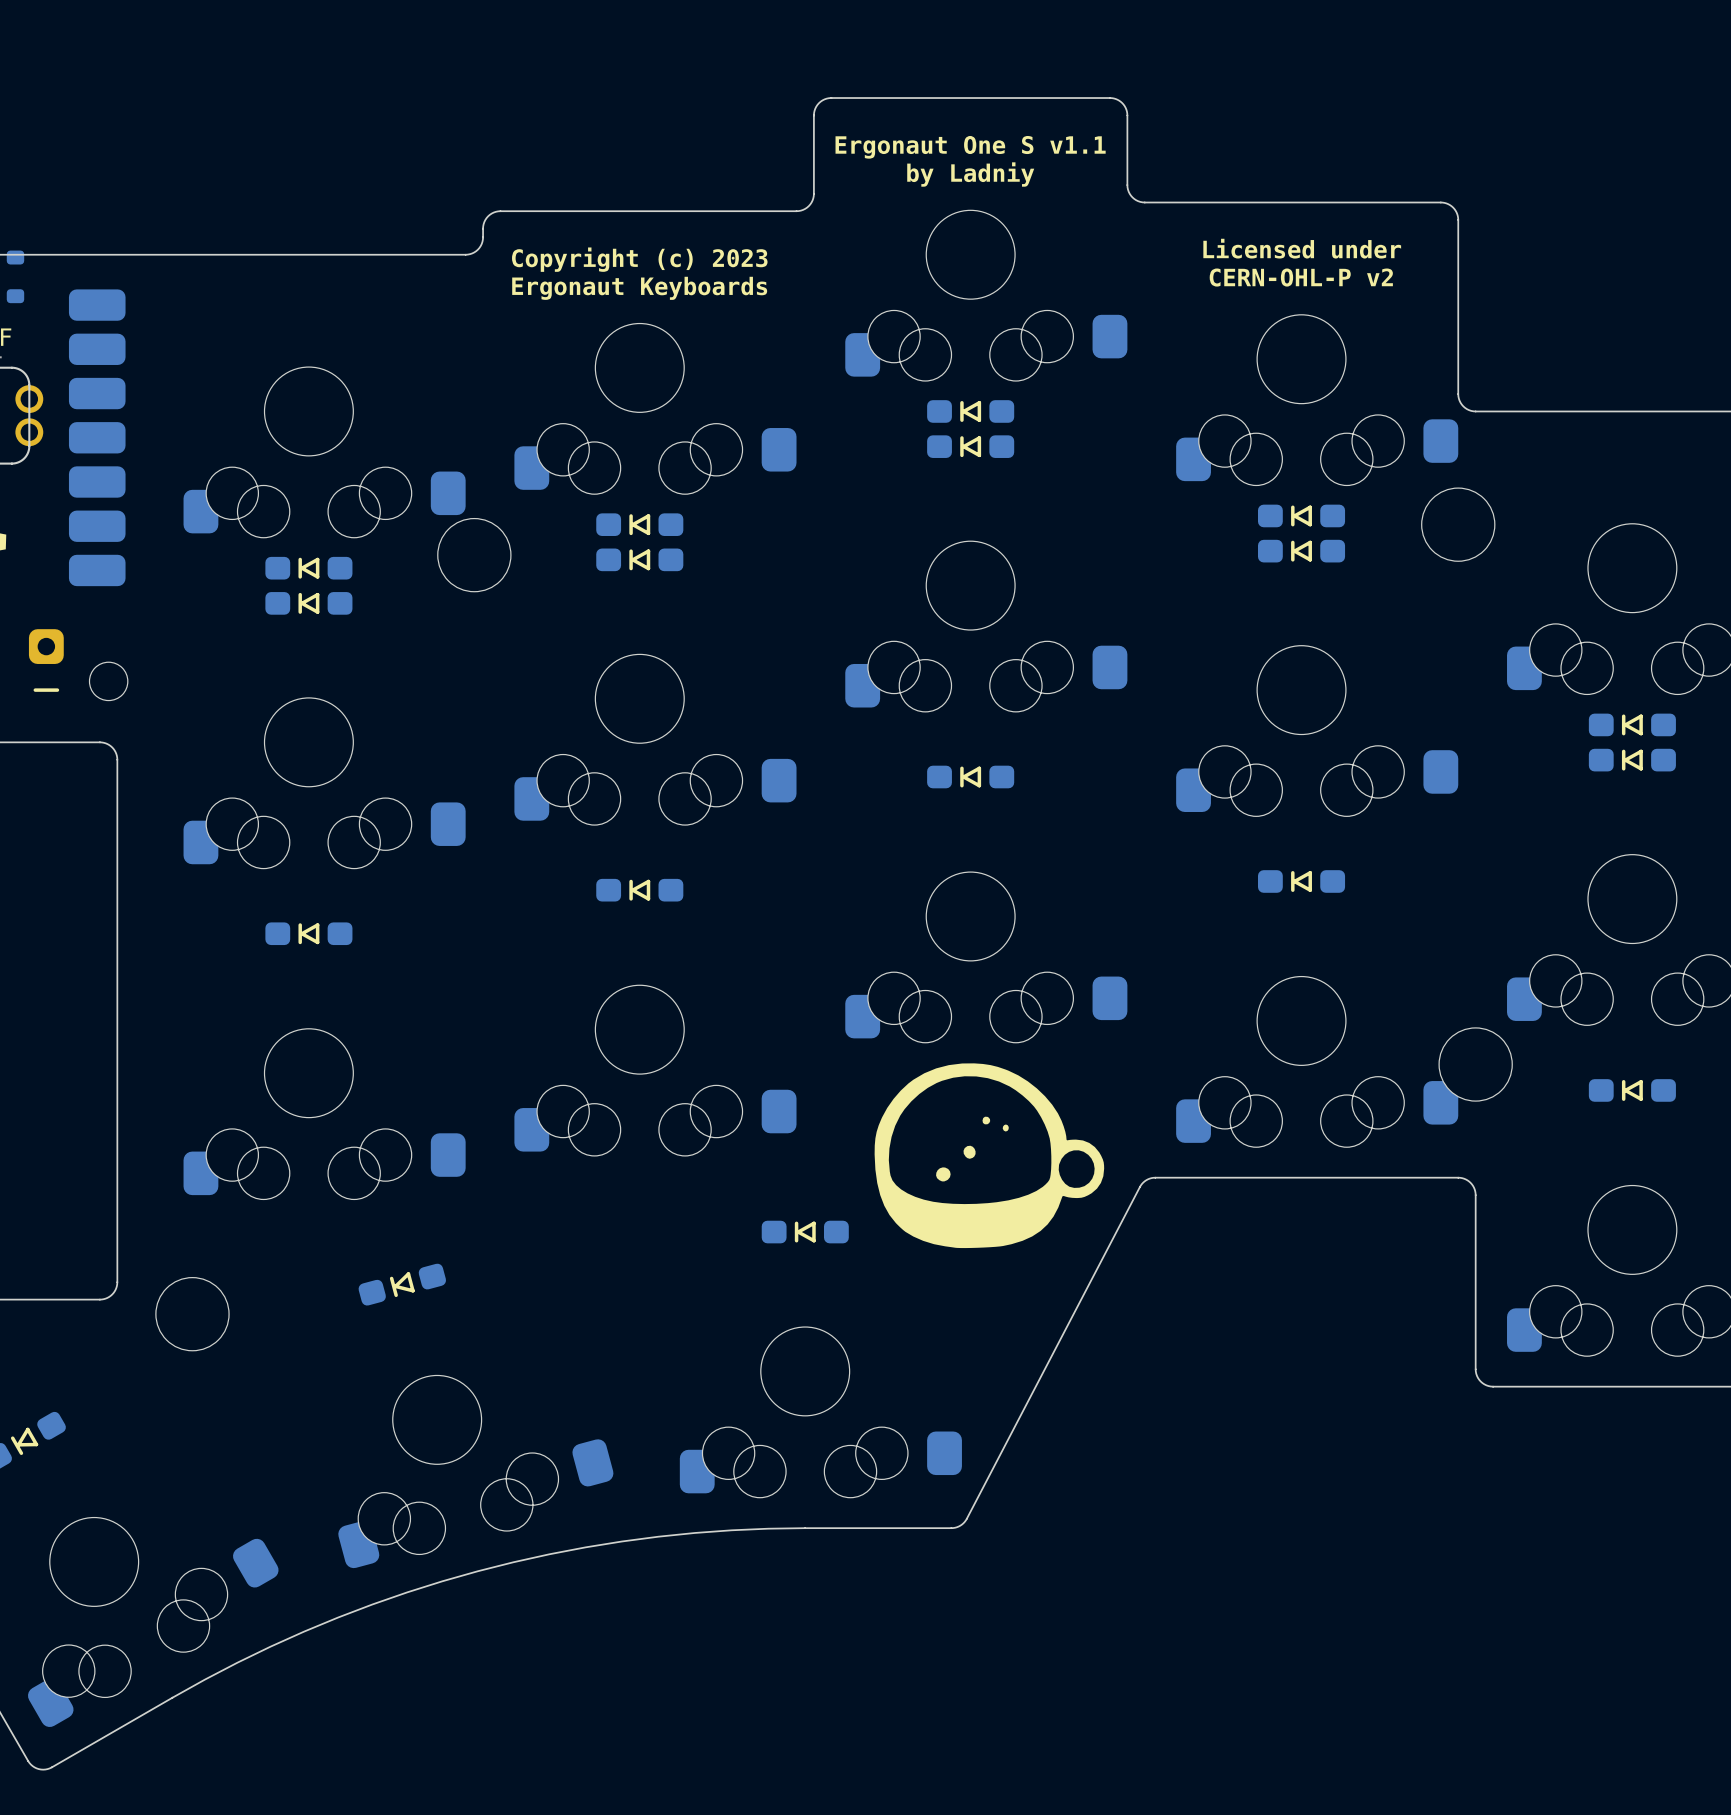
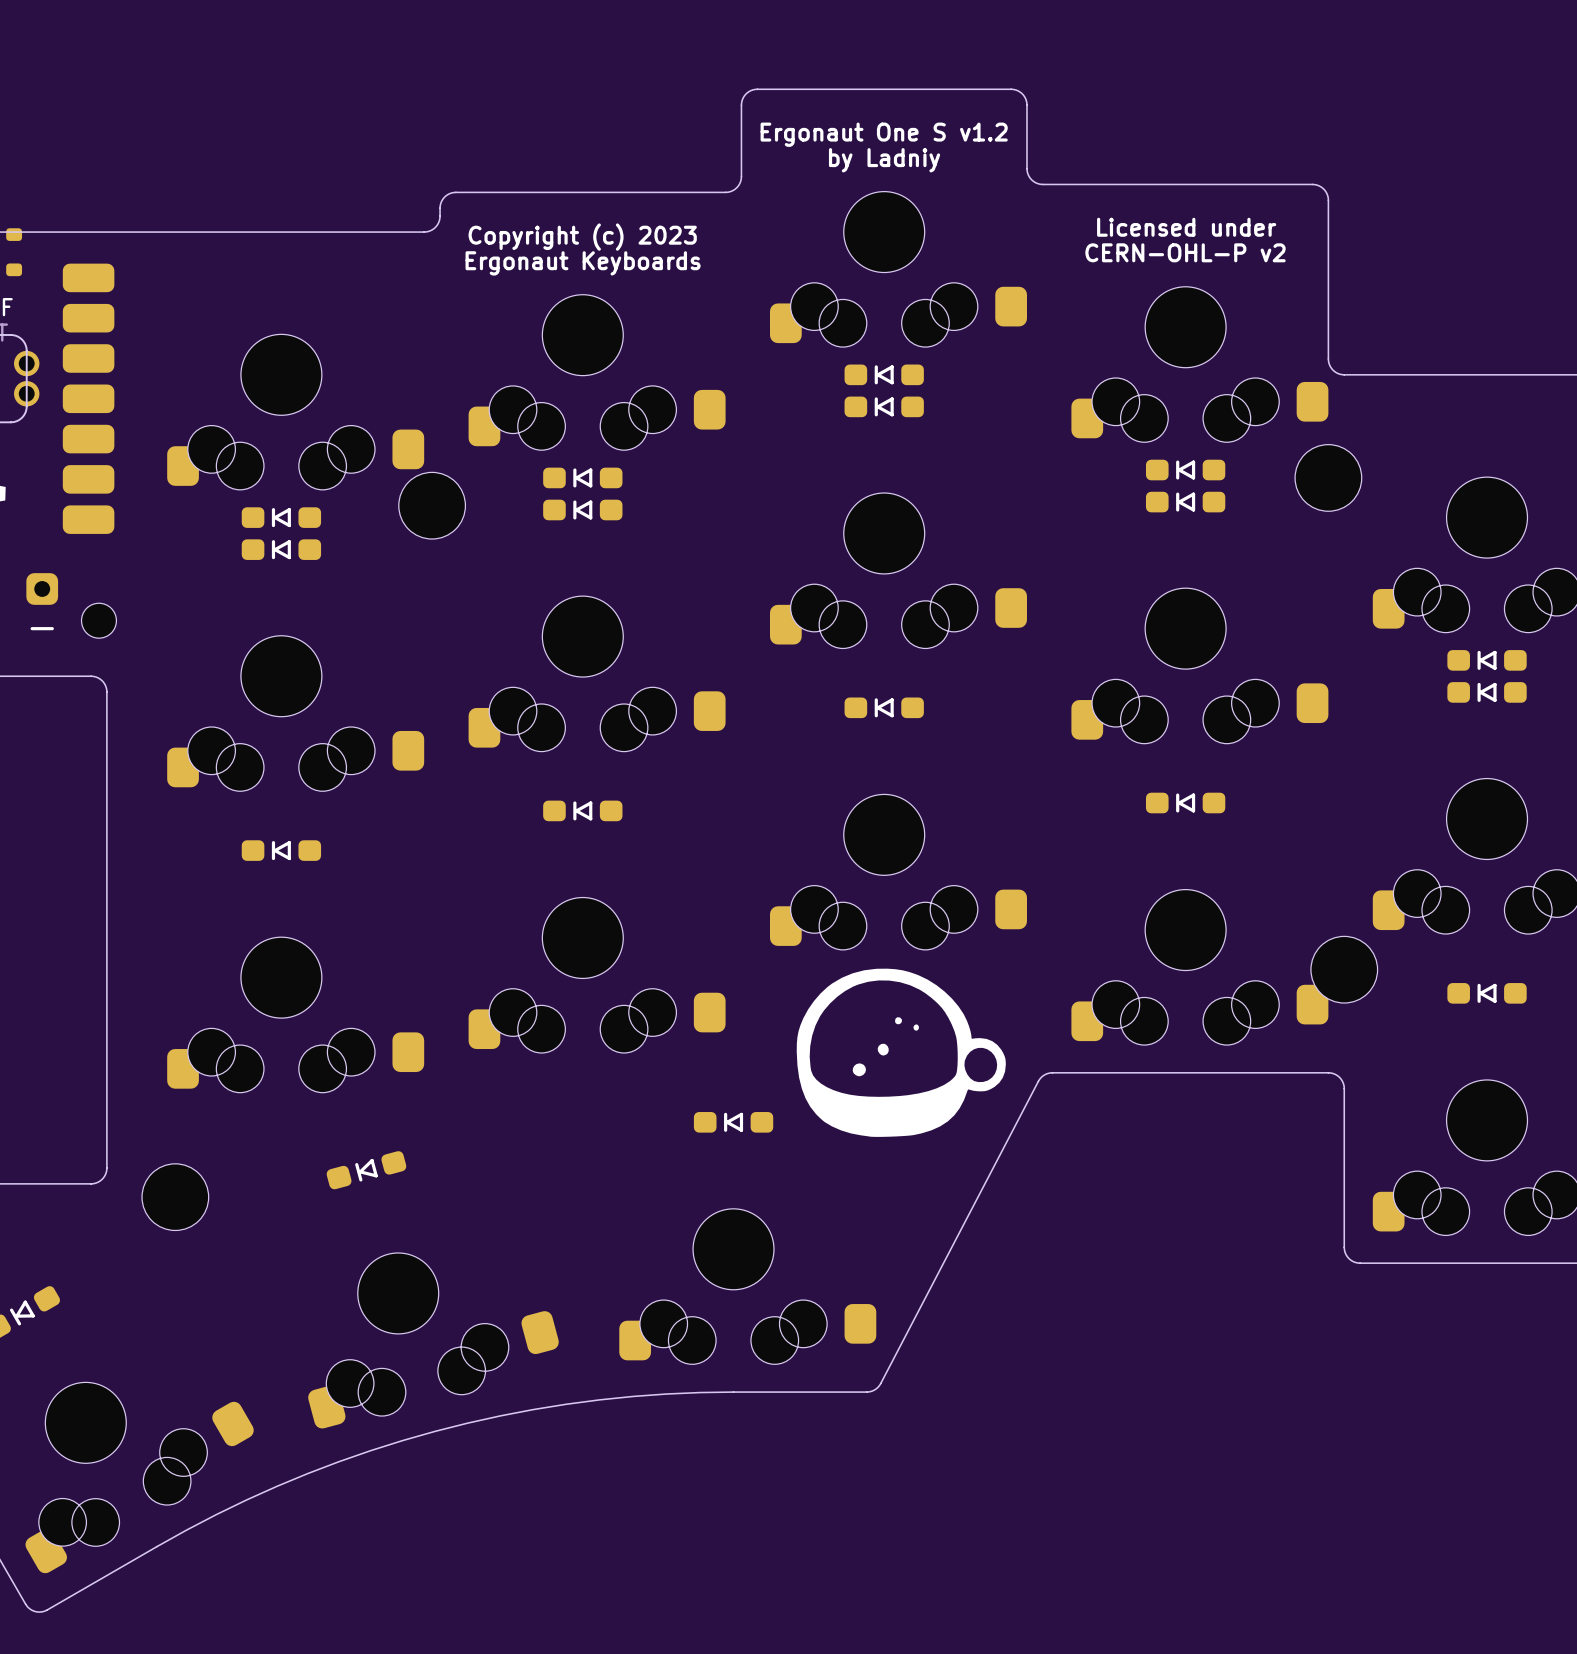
text: Ergonaut One S v1.1 (970, 147) -> Ergonaut One S v1.2 (884, 134)

